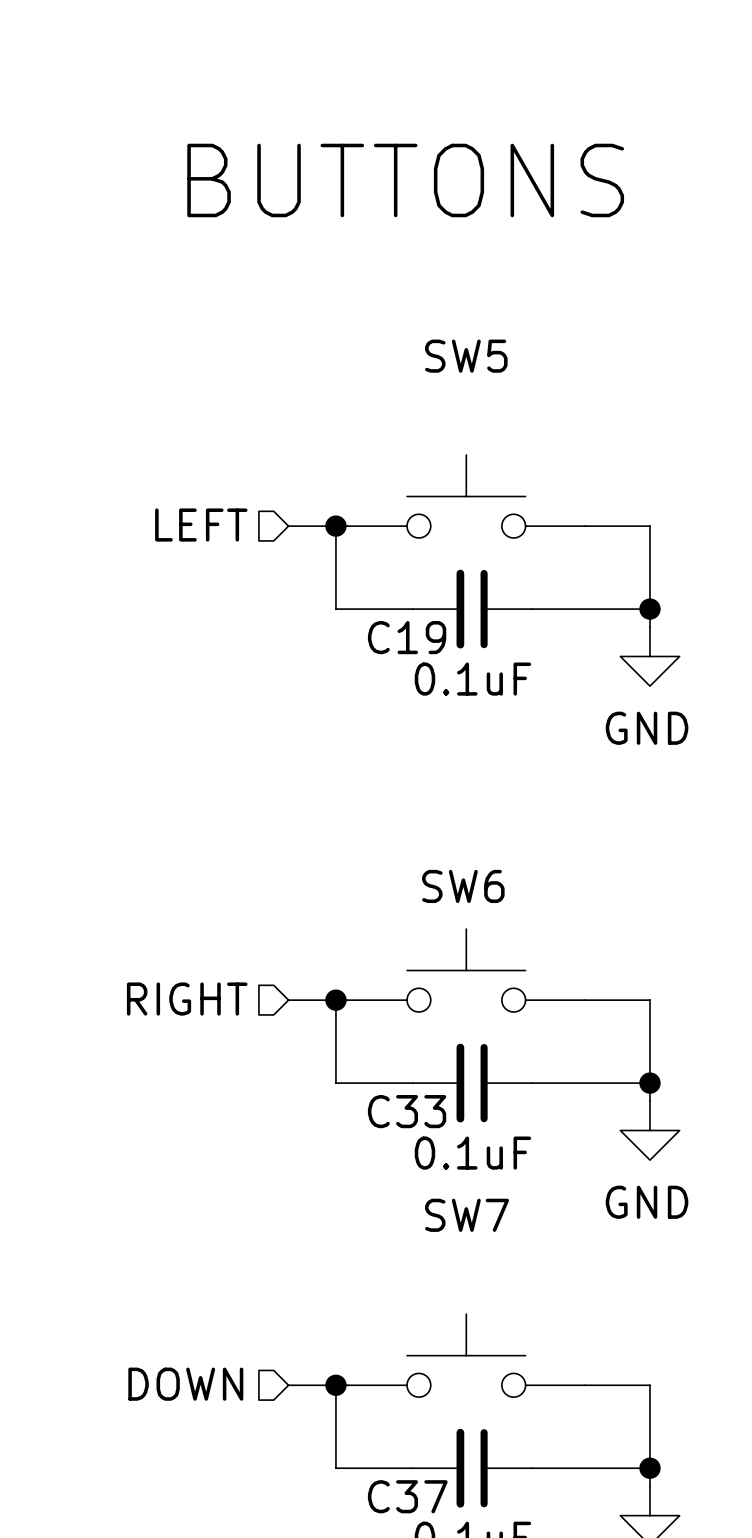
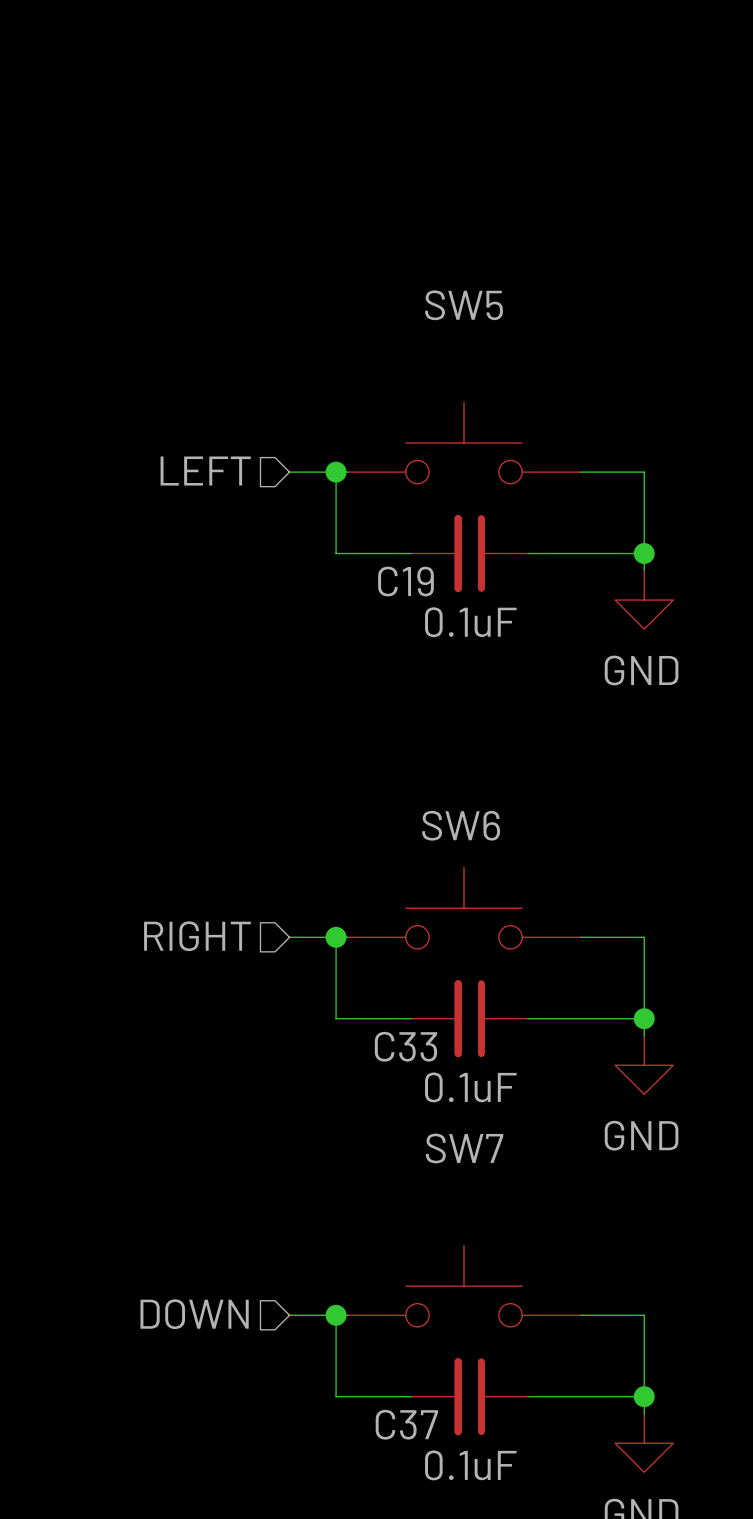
text: BUTTONS (405, 180) -> none

